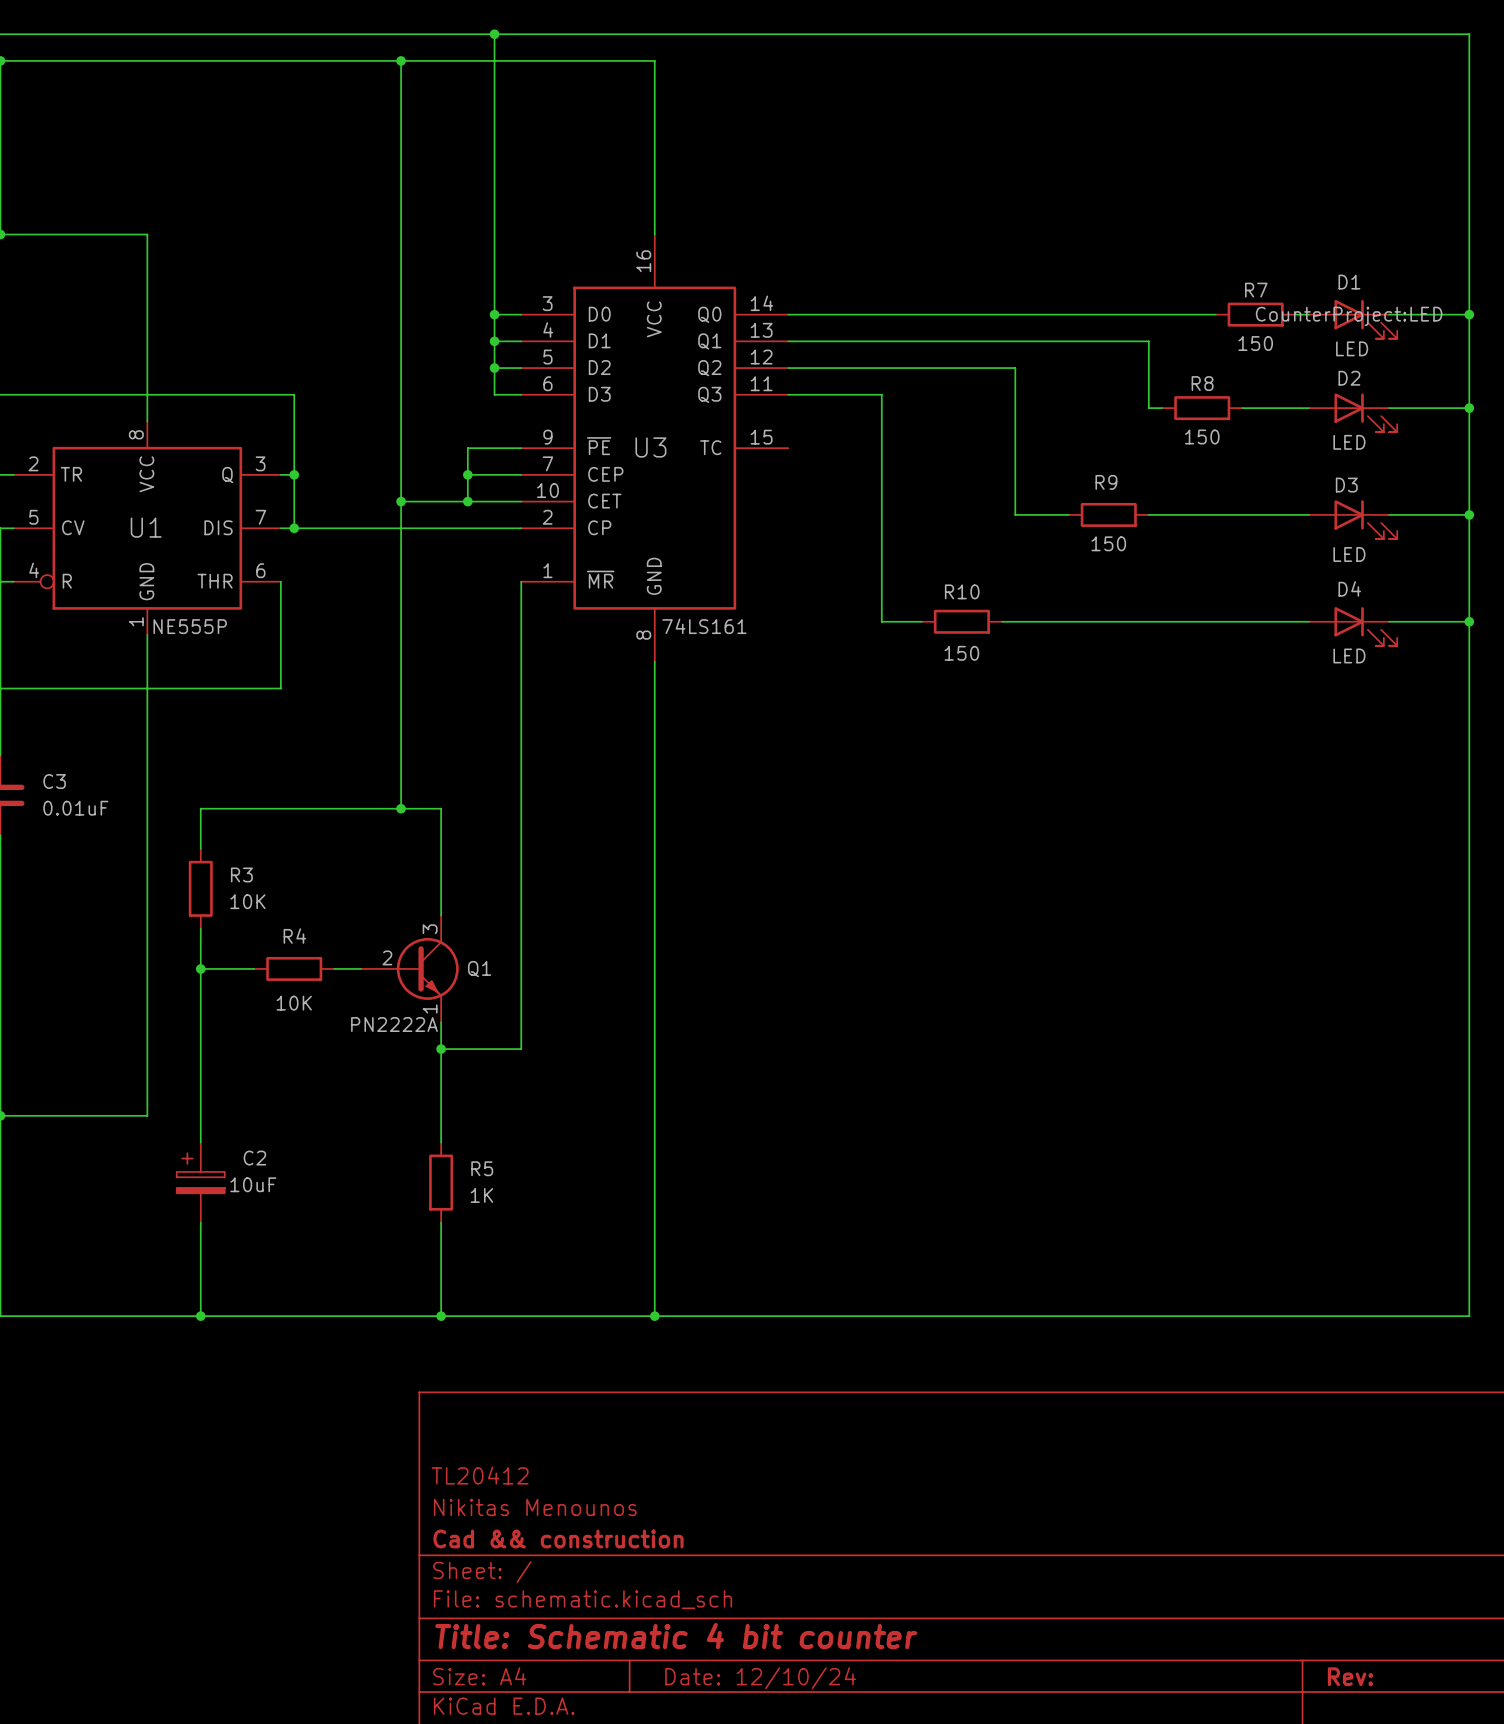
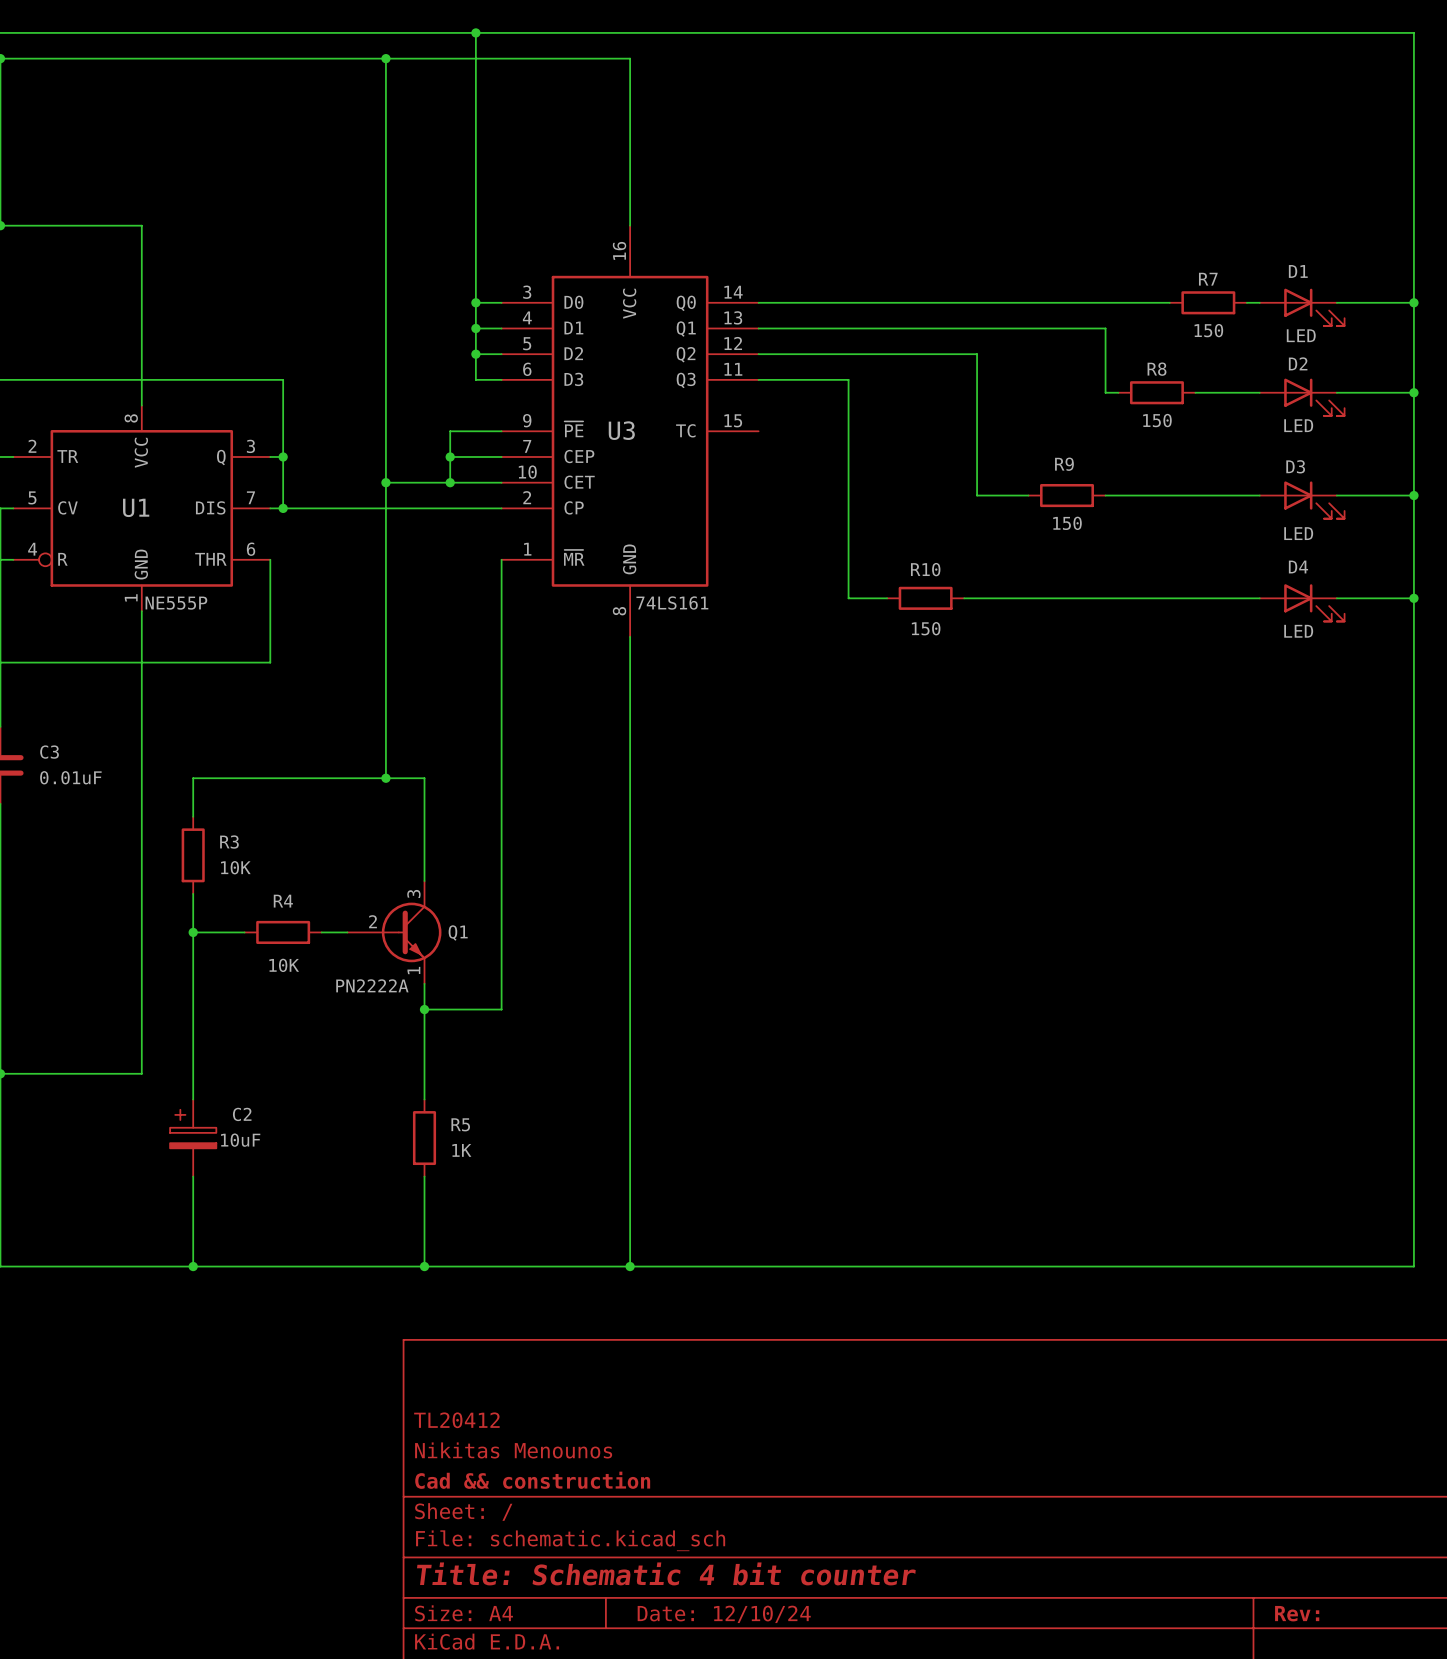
D1 text: CounterProject:LED (1349, 316) -> none

